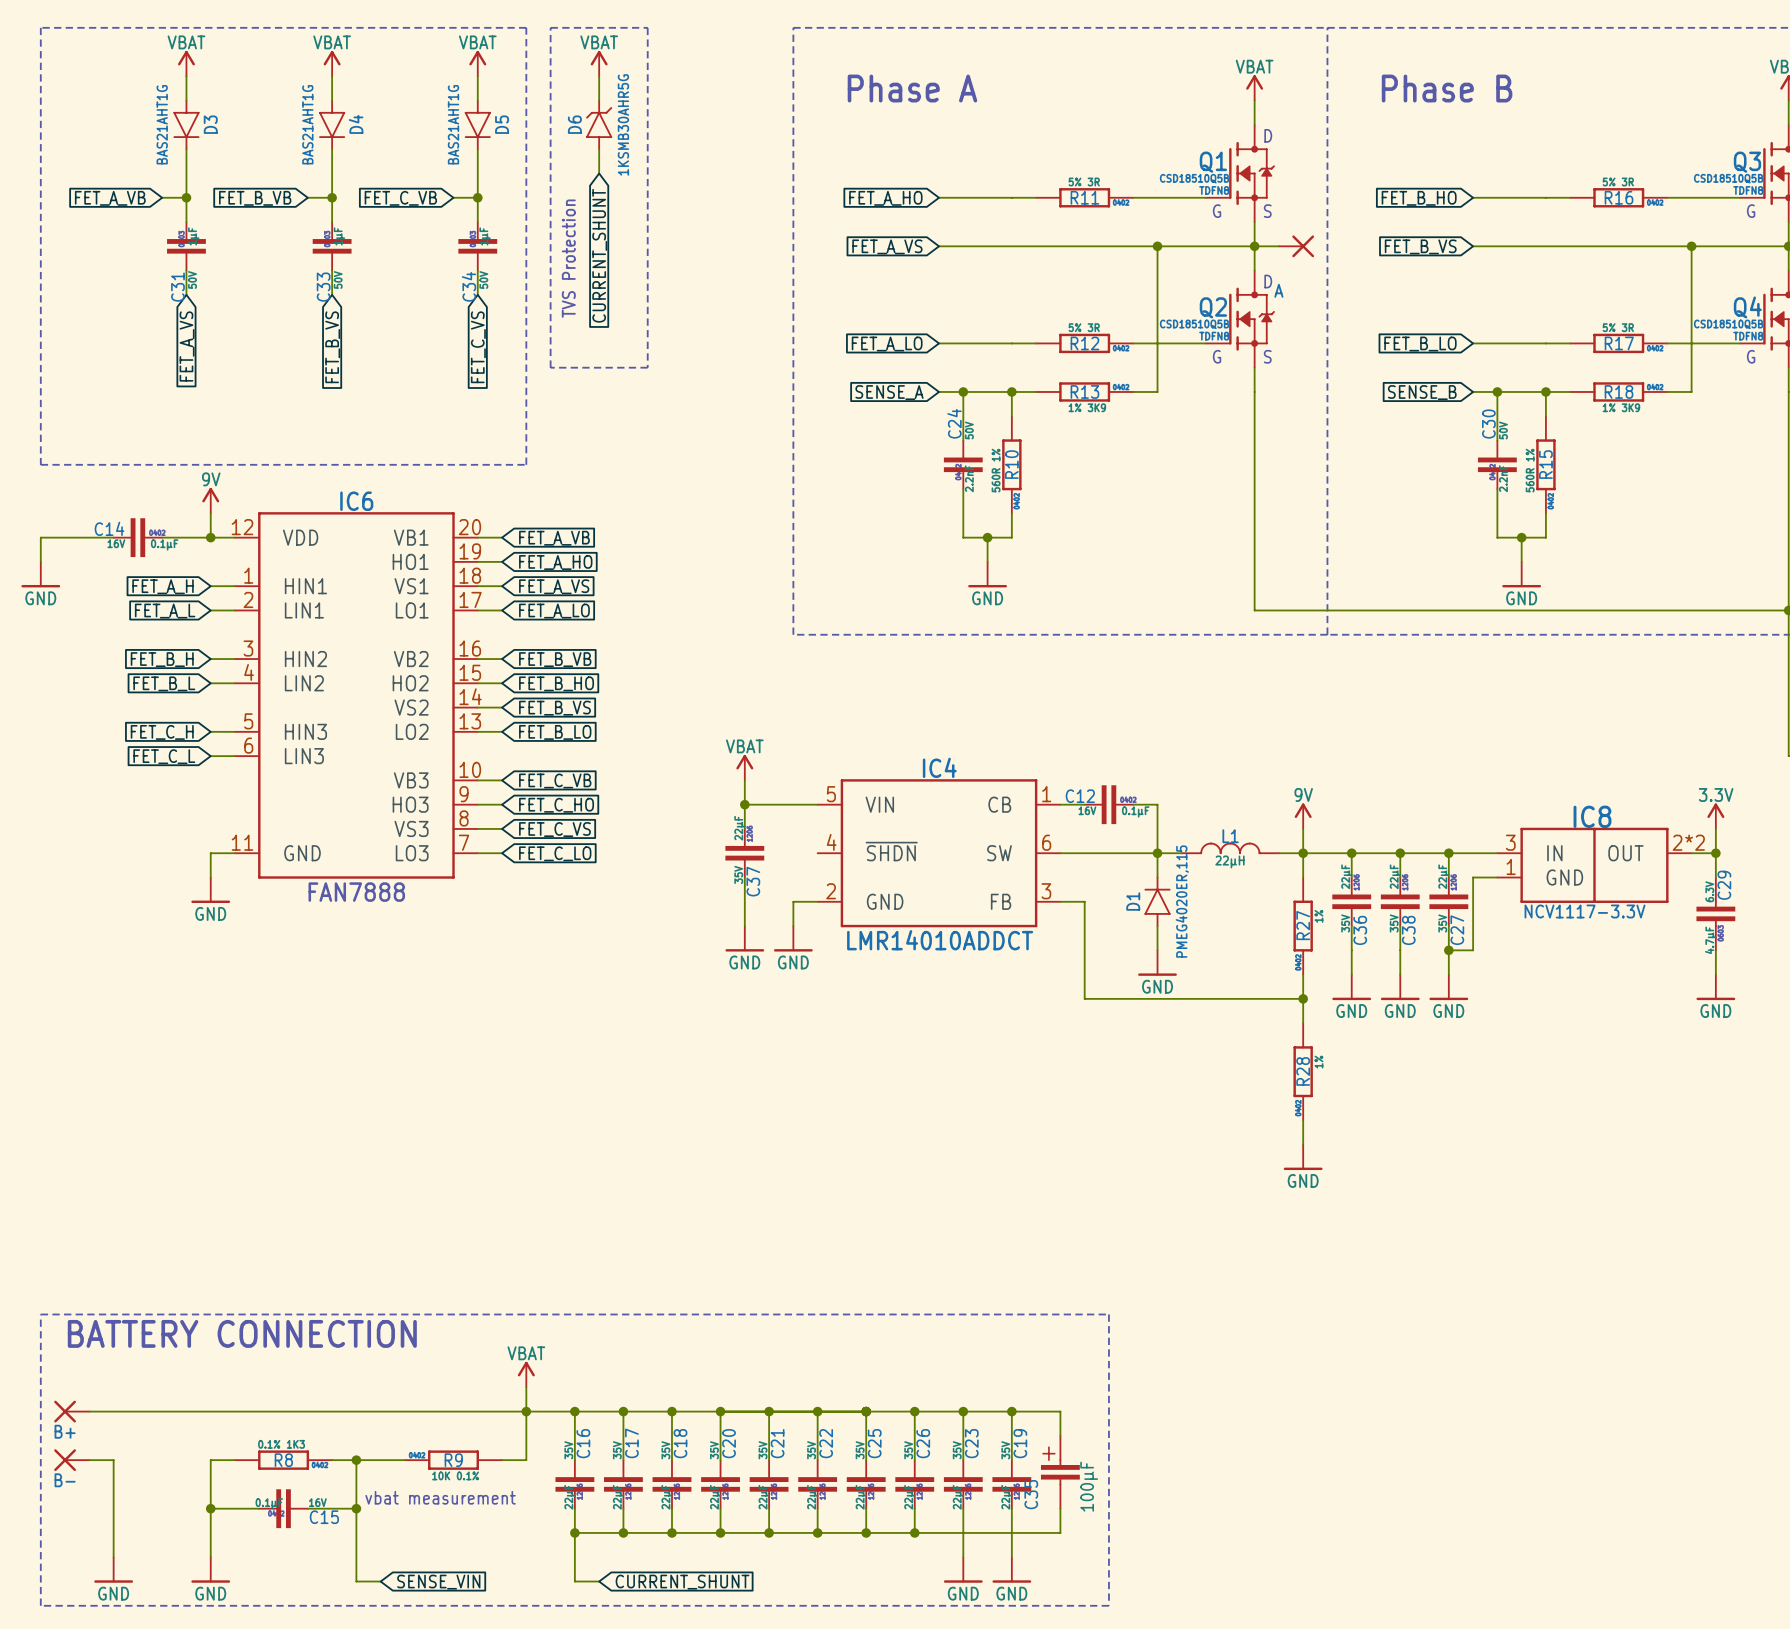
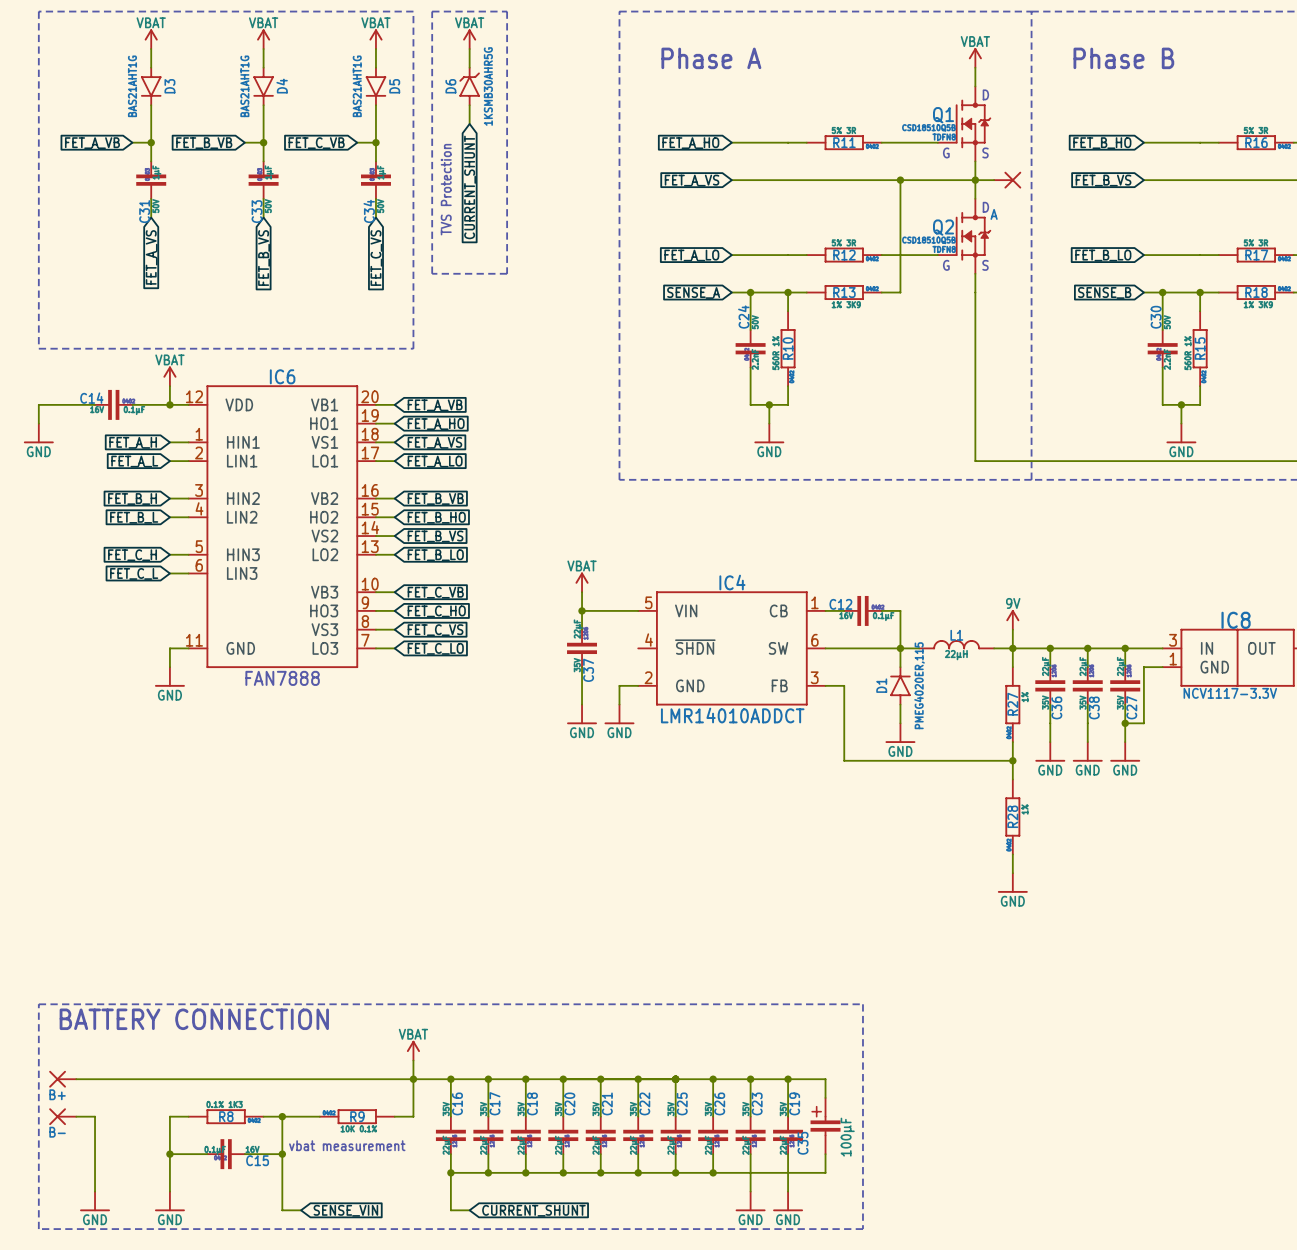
power symbol: 9V (210, 500) -> VBAT (169, 376)

